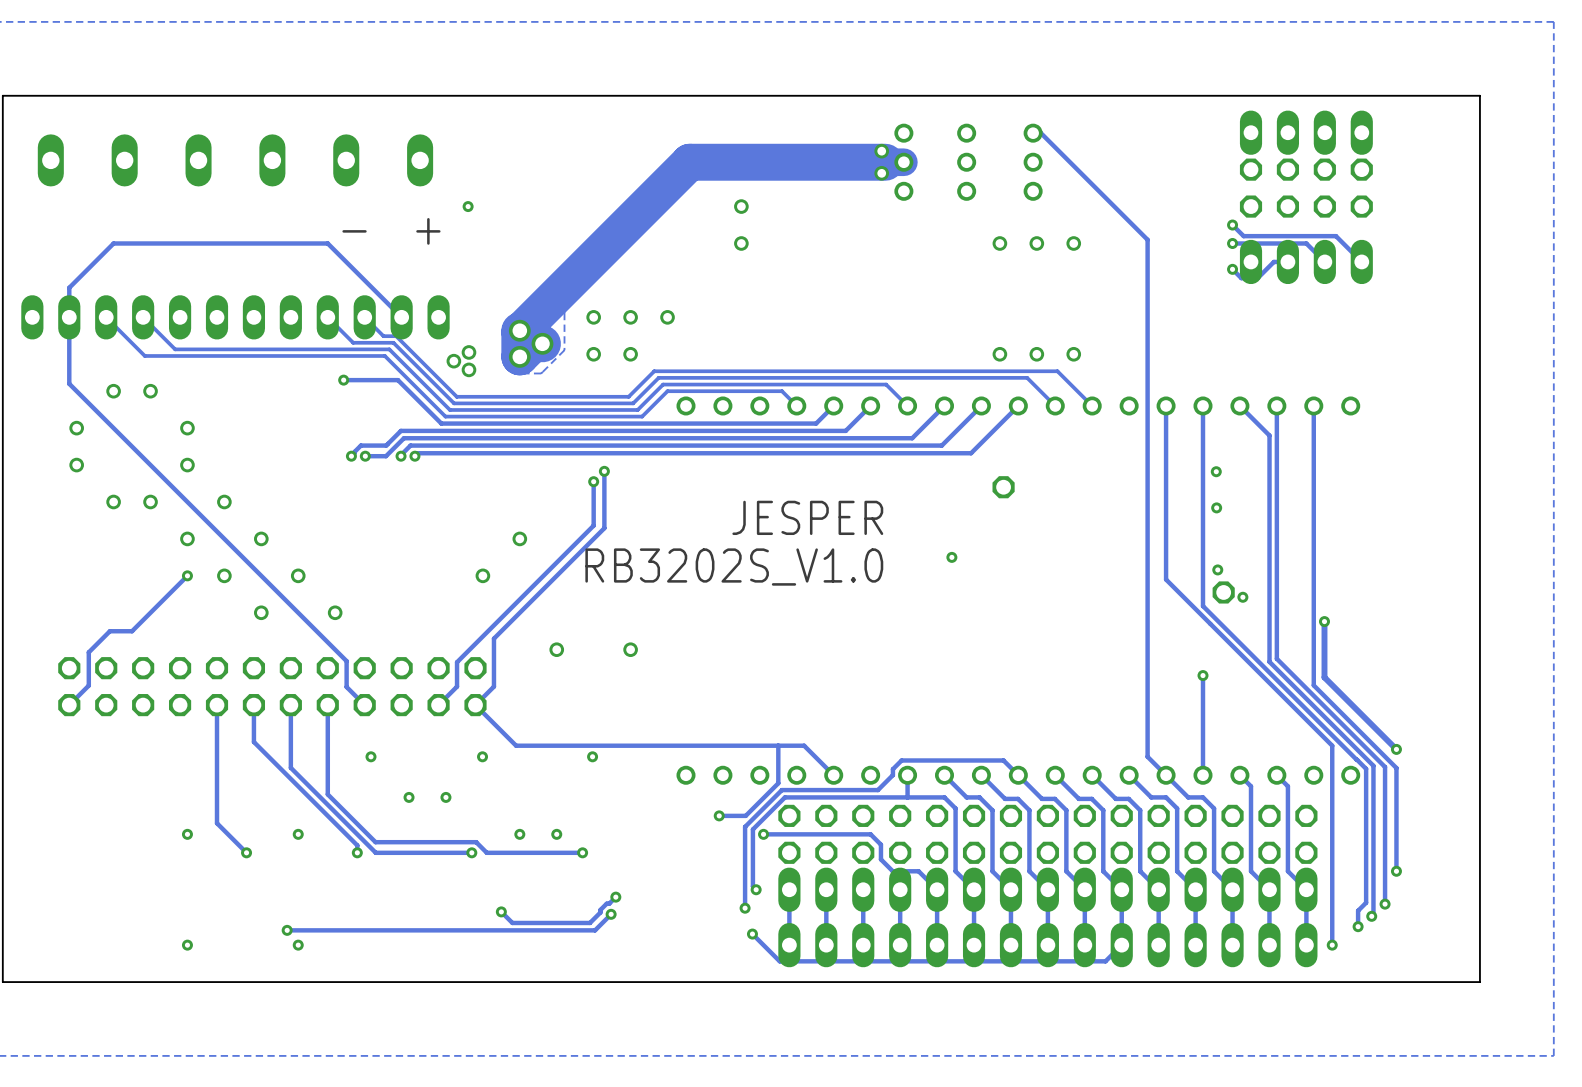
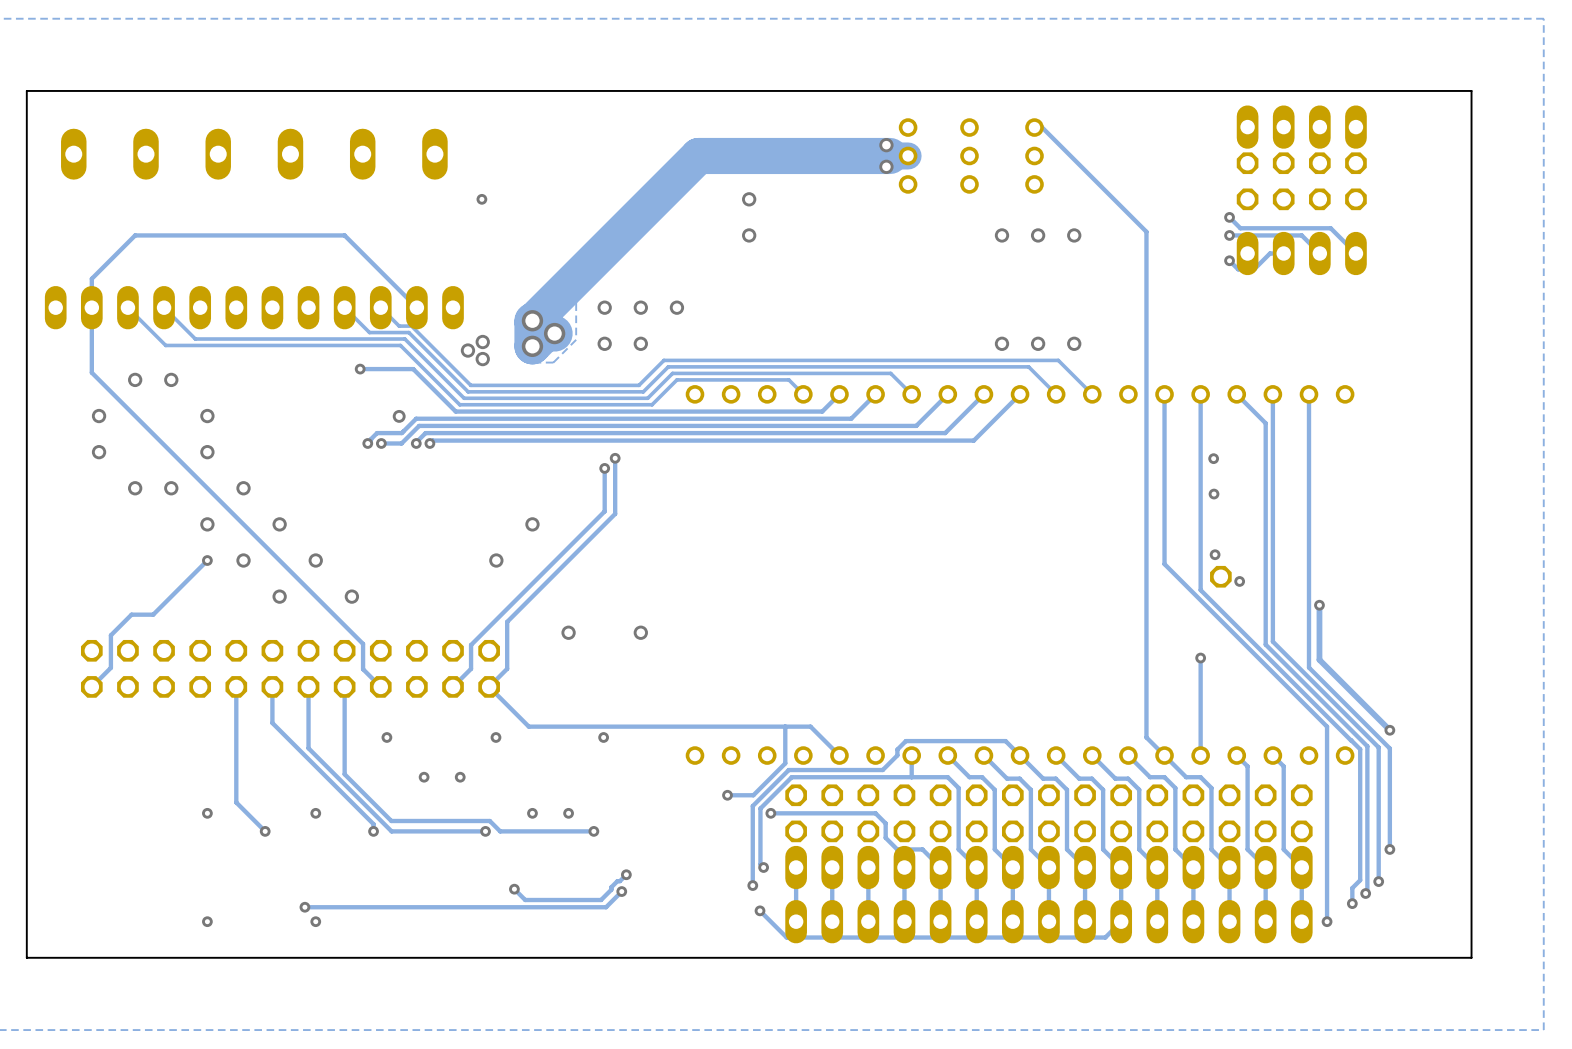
text: - (354, 231) -> none
text: + (428, 231) -> none
via: none -> (399, 416)
part: (1003, 487) -> none
text: JESPER (807, 517) -> none
via: (951, 557) -> none
text: RB3202S_V1.0 (734, 567) -> none

